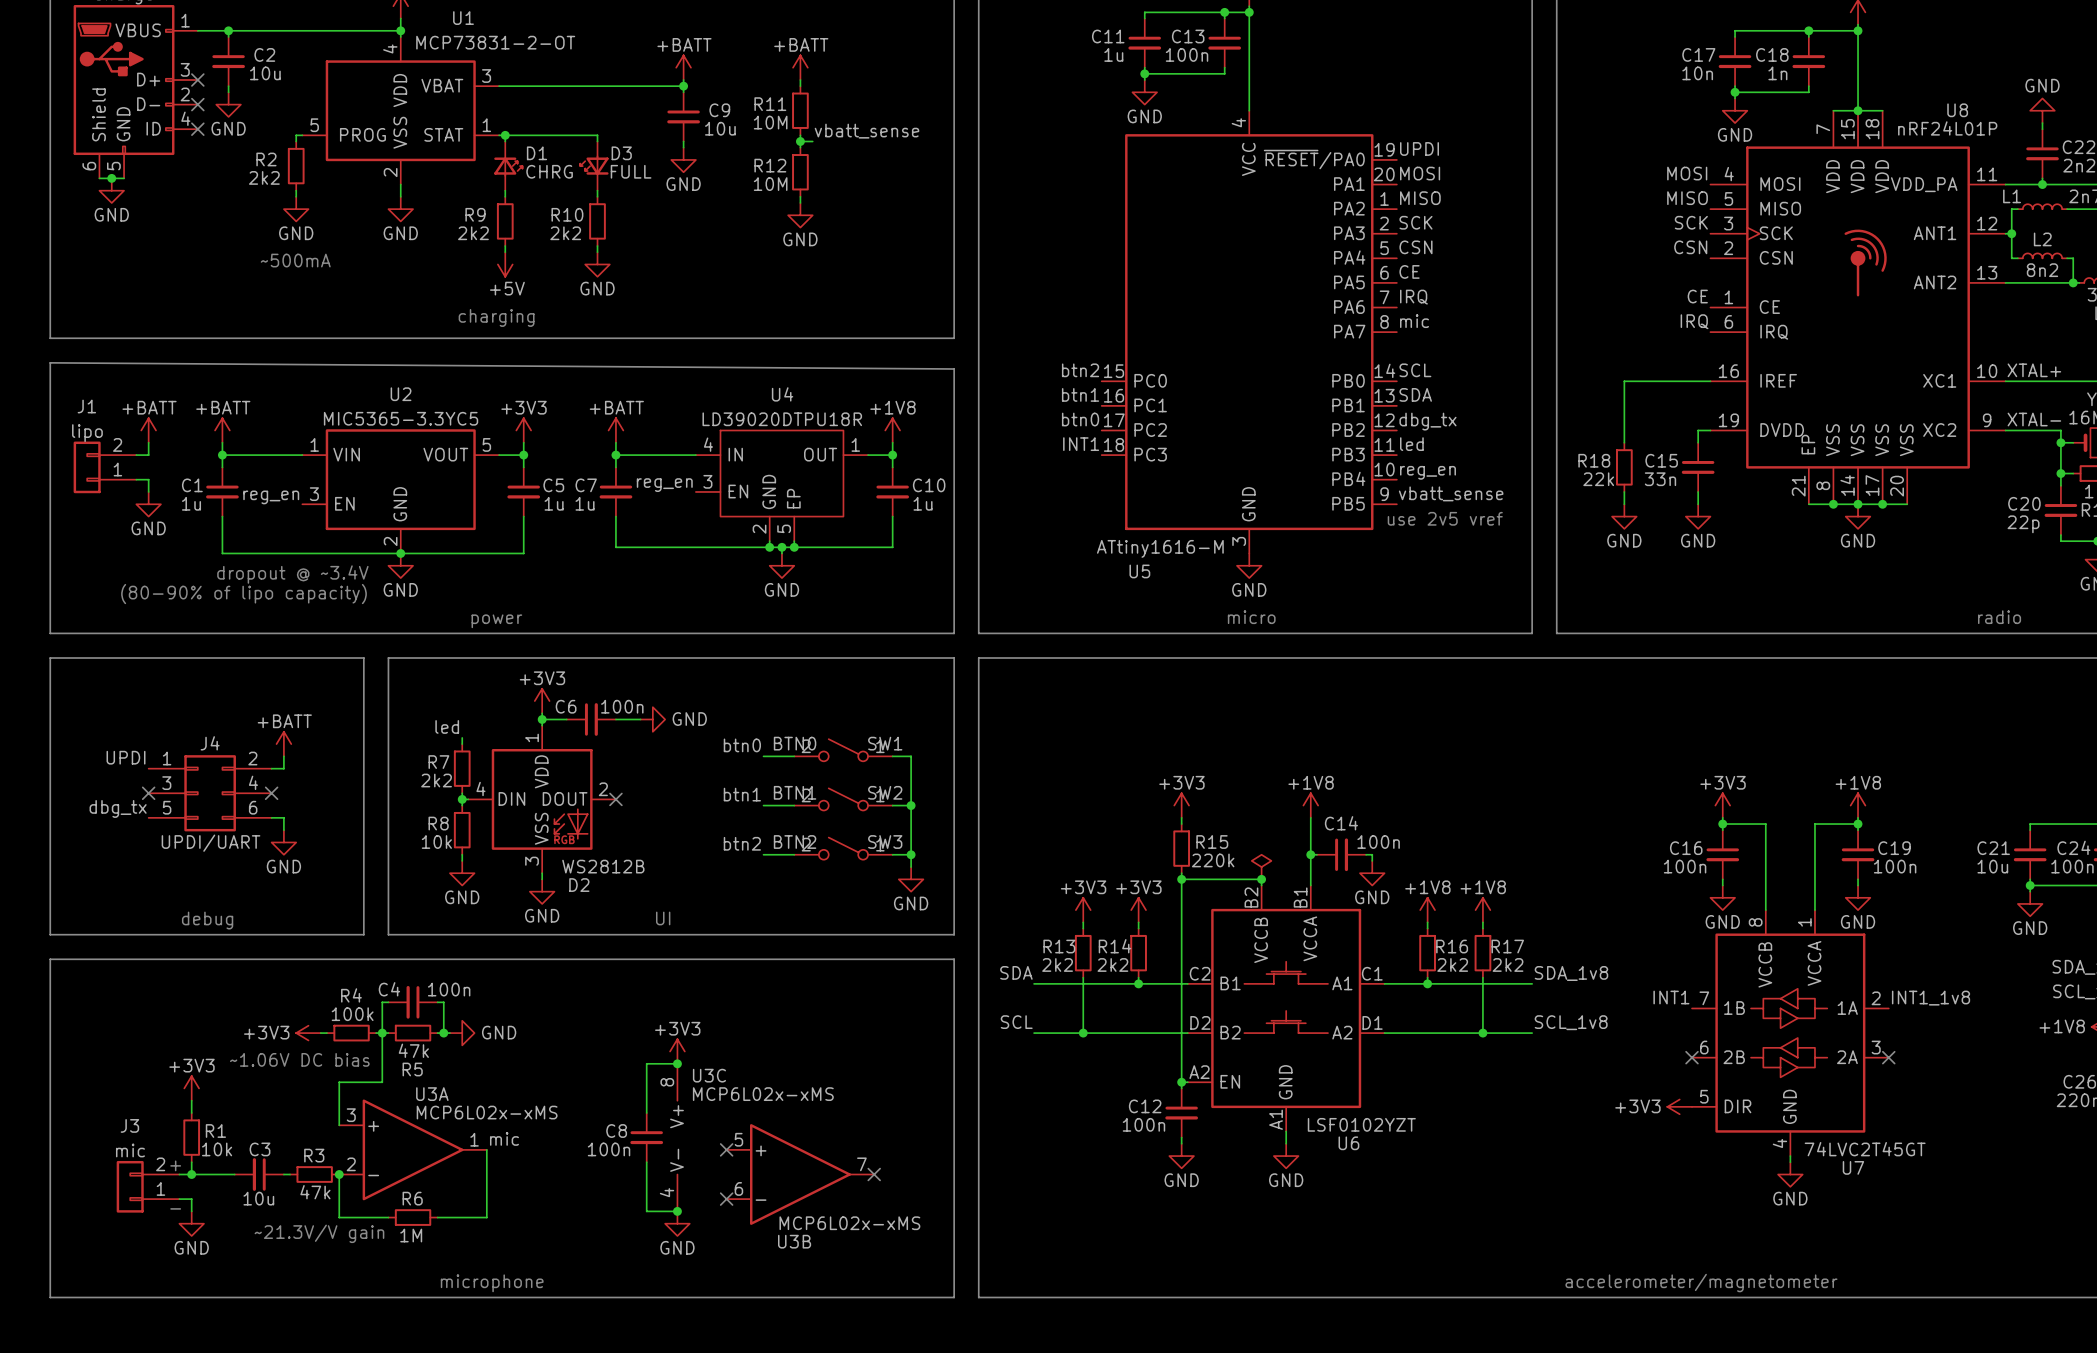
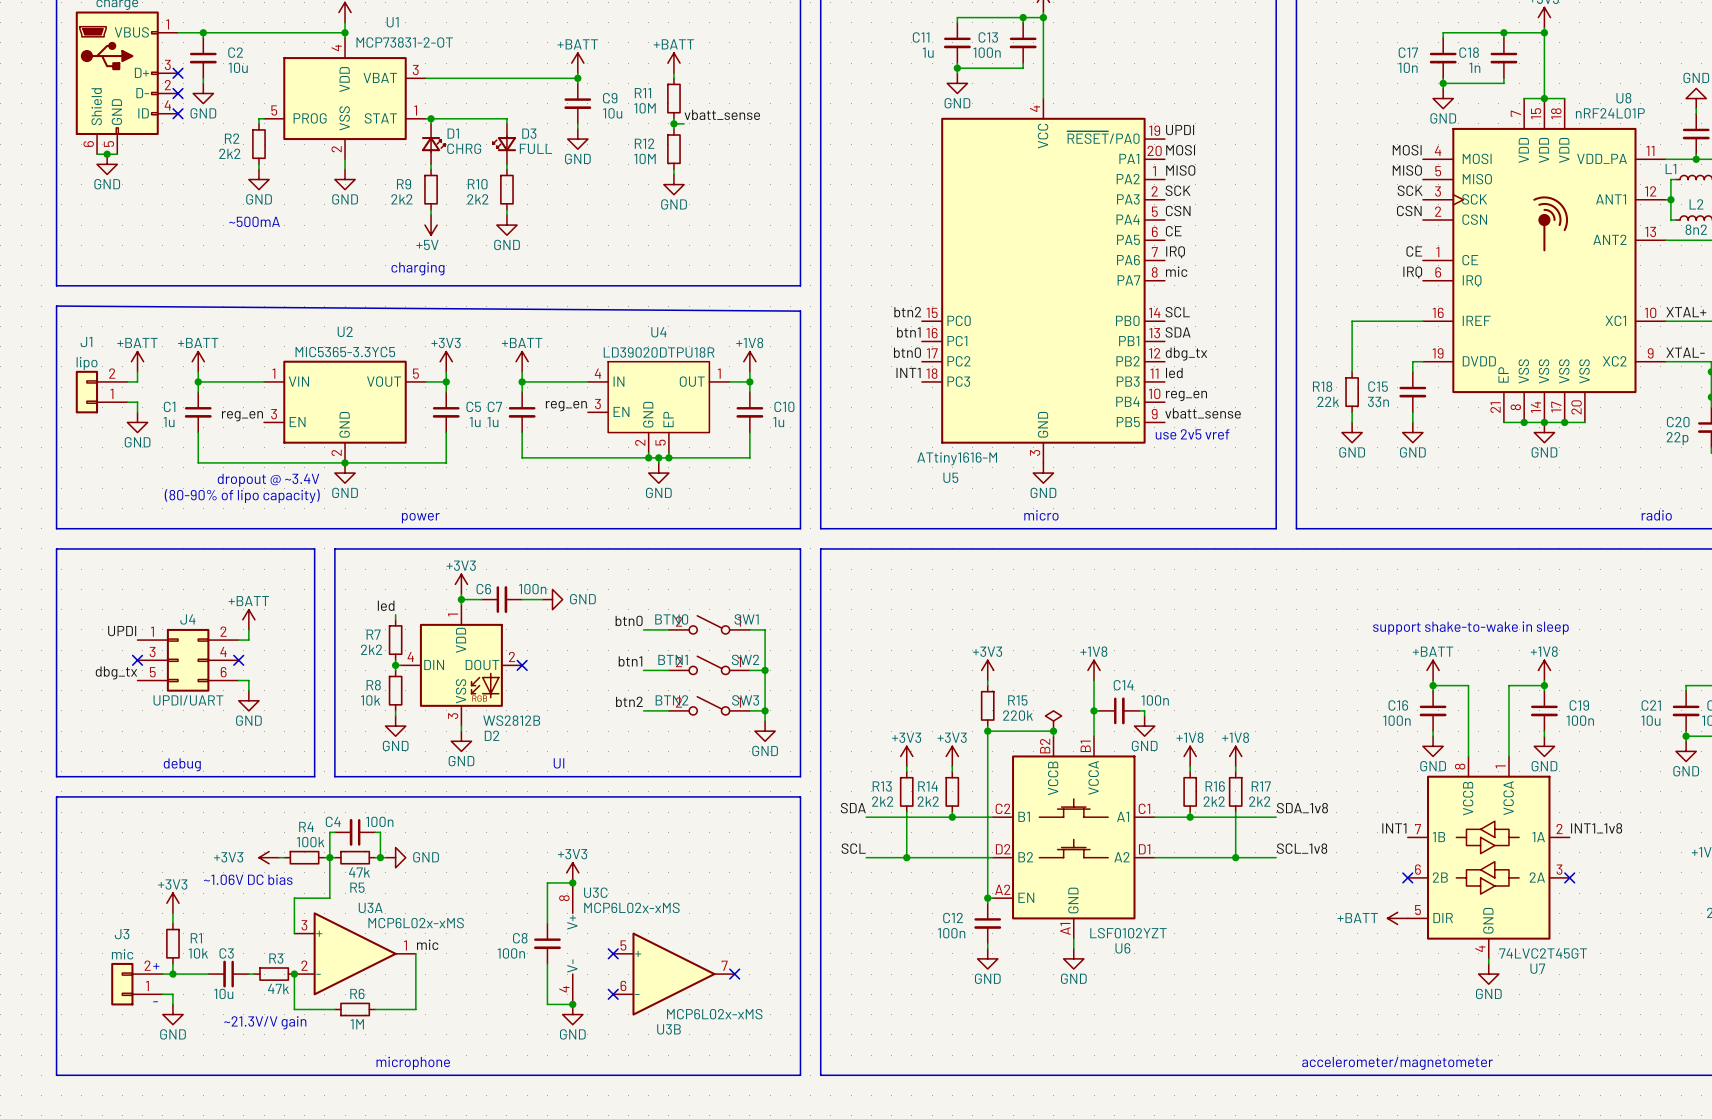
text: none -> support shake-to-wake in sleep (1470, 628)
power symbol: +3V3 (1722, 805) -> +BATT (1433, 670)
power symbol: +3V3 (1679, 1106) -> +BATT (1397, 918)

